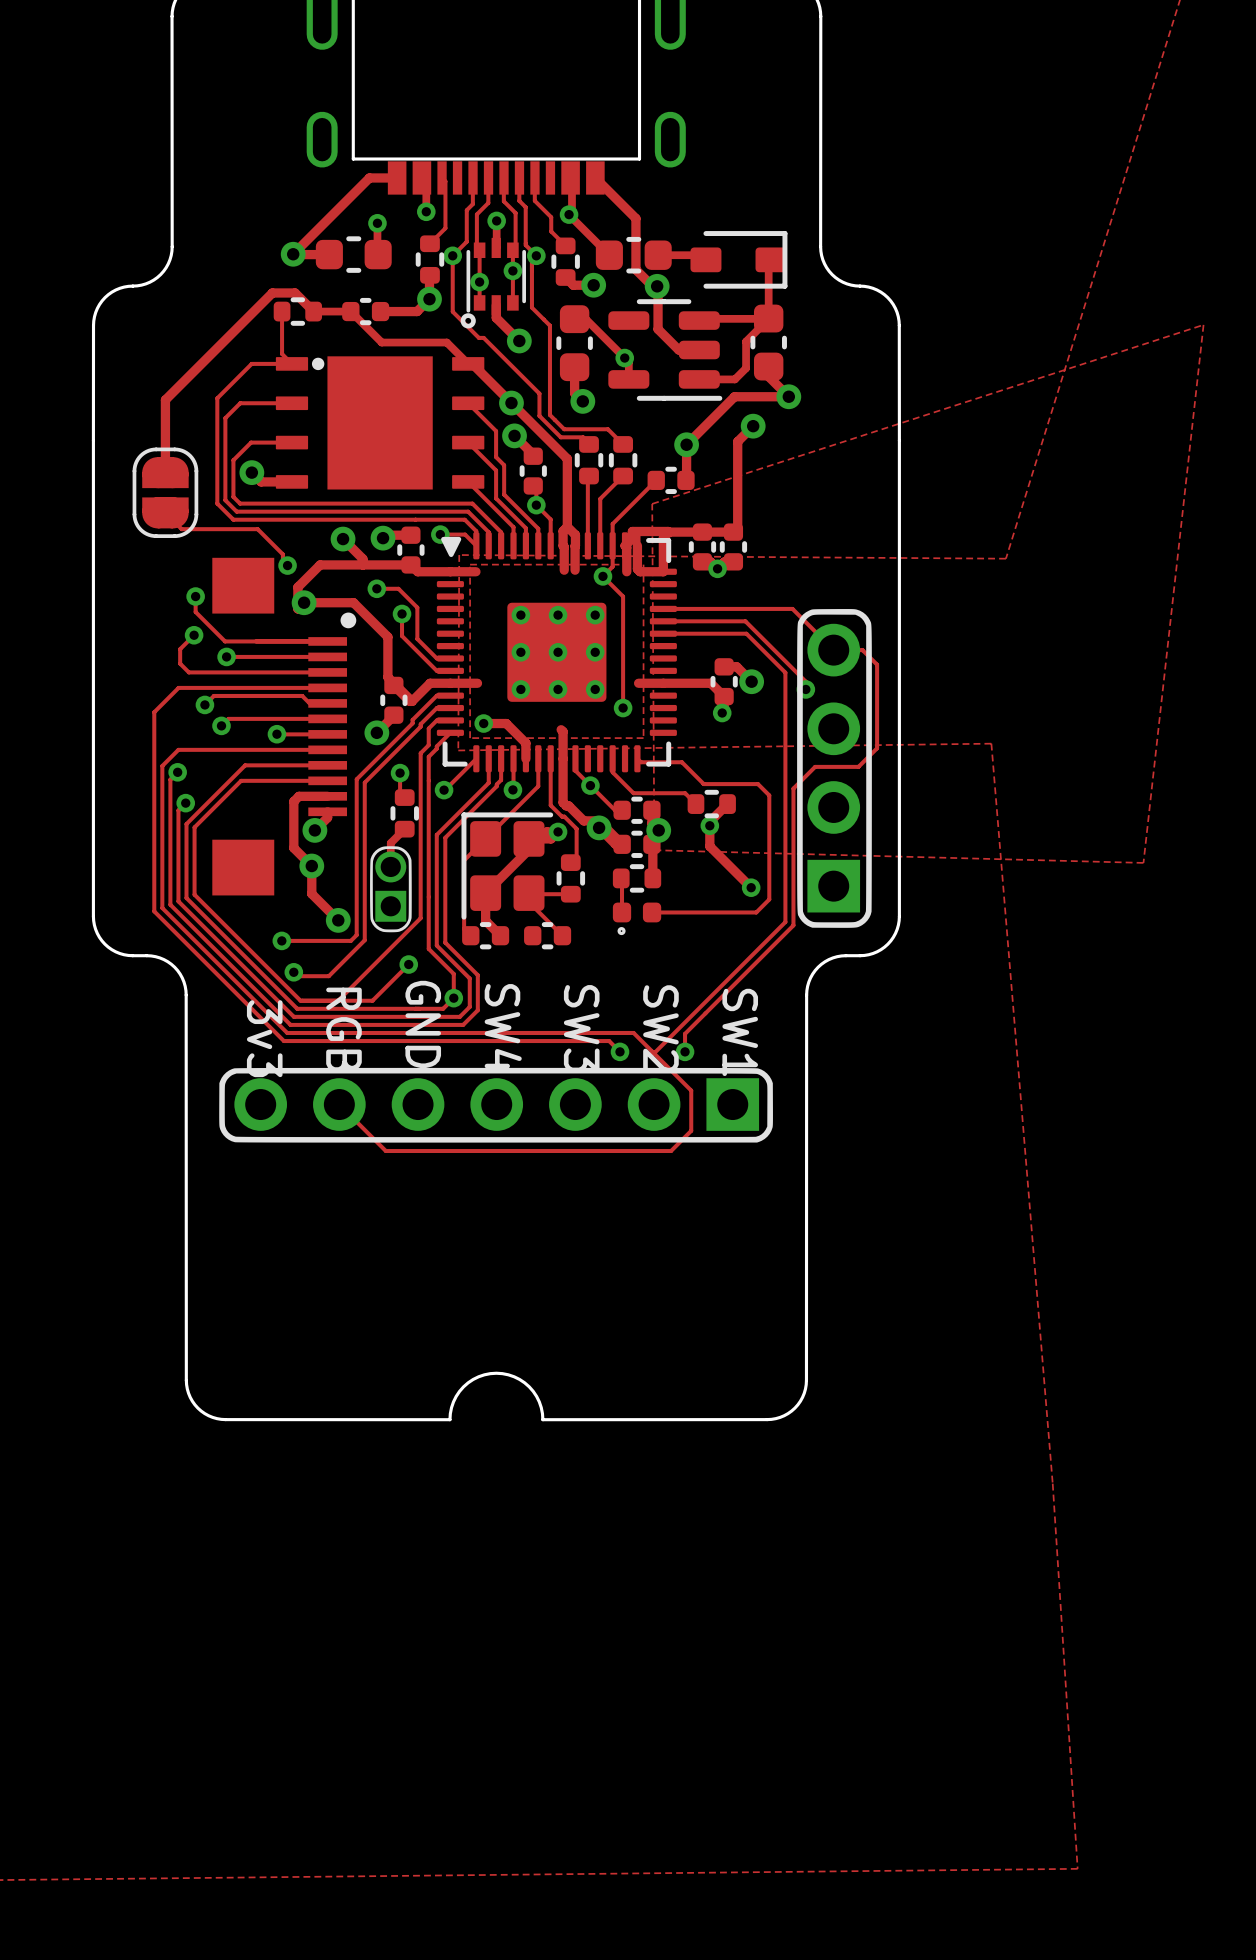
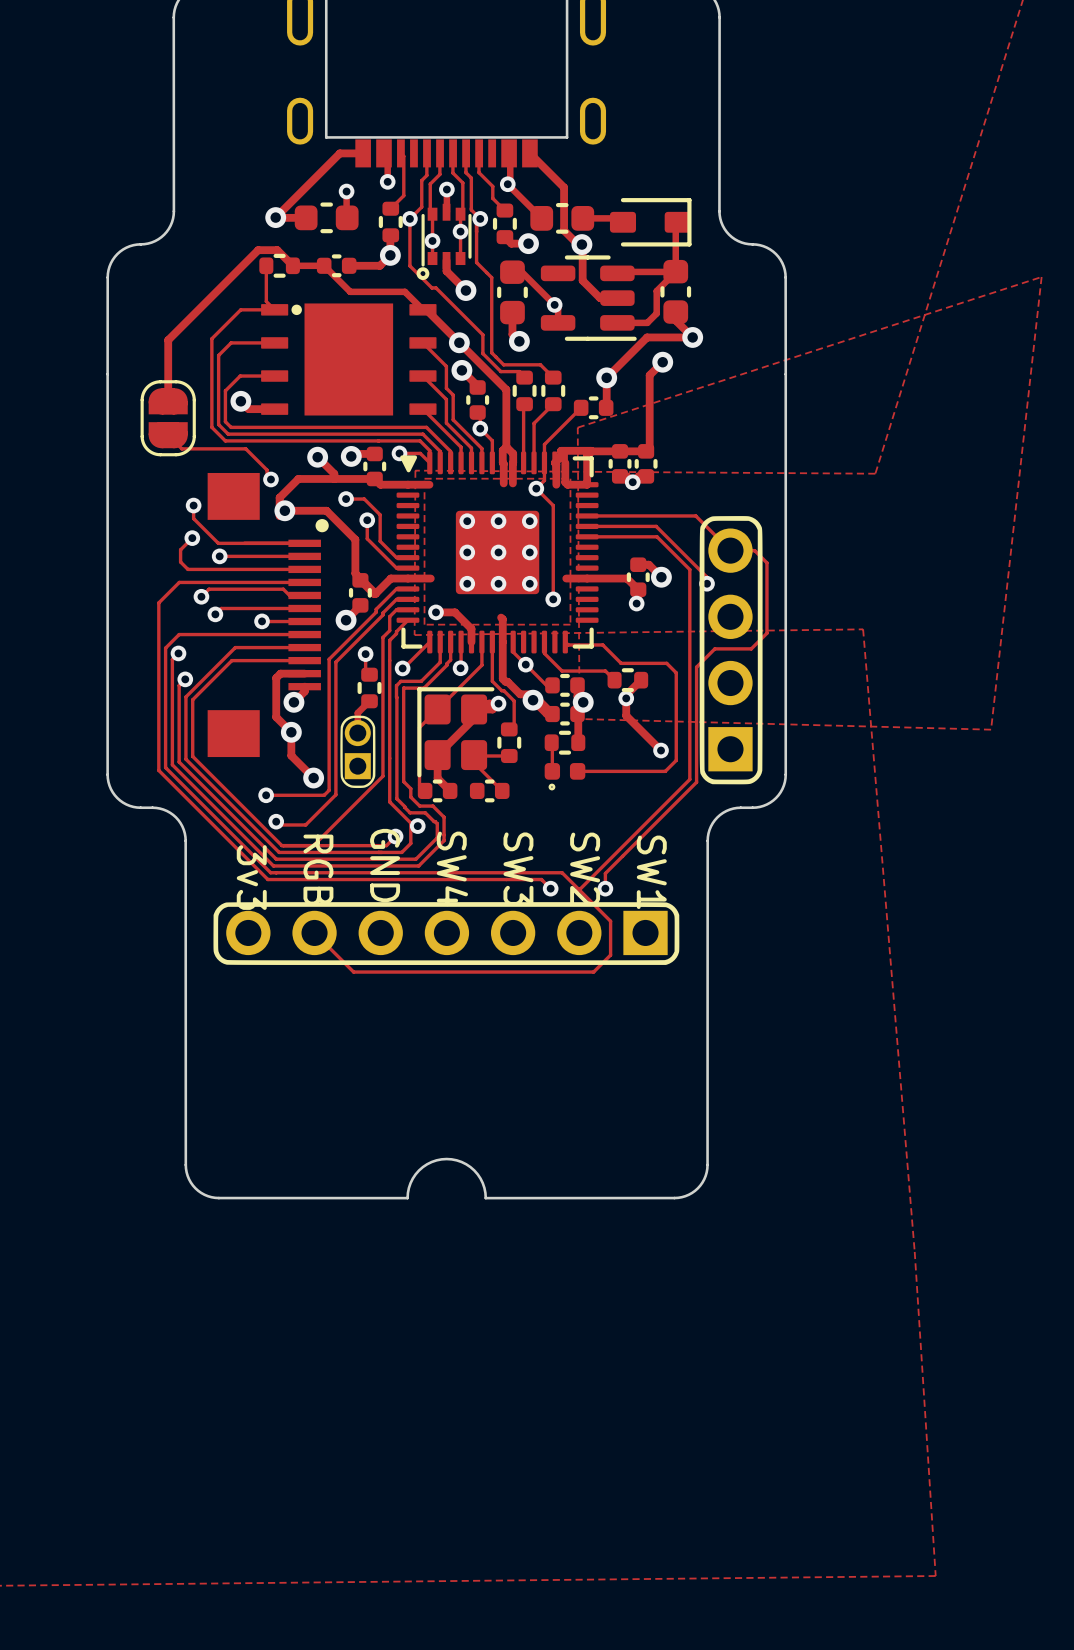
track: (466, 805) (436, 834) (436, 945) (446, 955) -> (421, 681) (400, 681) (396, 685) (396, 798) (404, 807)
track: (469, 813) (445, 837) -> (424, 688) (403, 688) (403, 708)
track: (445, 924) (445, 942) (477, 975) (477, 1010) -> (403, 781) (410, 788) (410, 797) (419, 806) (432, 806) (444, 817) (444, 840) (431, 853)
track: (453, 961) (469, 978) (469, 1006) -> (410, 812) (425, 812) (437, 823) (437, 837) (424, 850)
track: (408, 964) (372, 1000) -> (395, 836) (386, 845) (342, 845)
via: (408, 964) -> none
via: none -> (417, 826)
via position: (453, 998) -> (395, 836)

